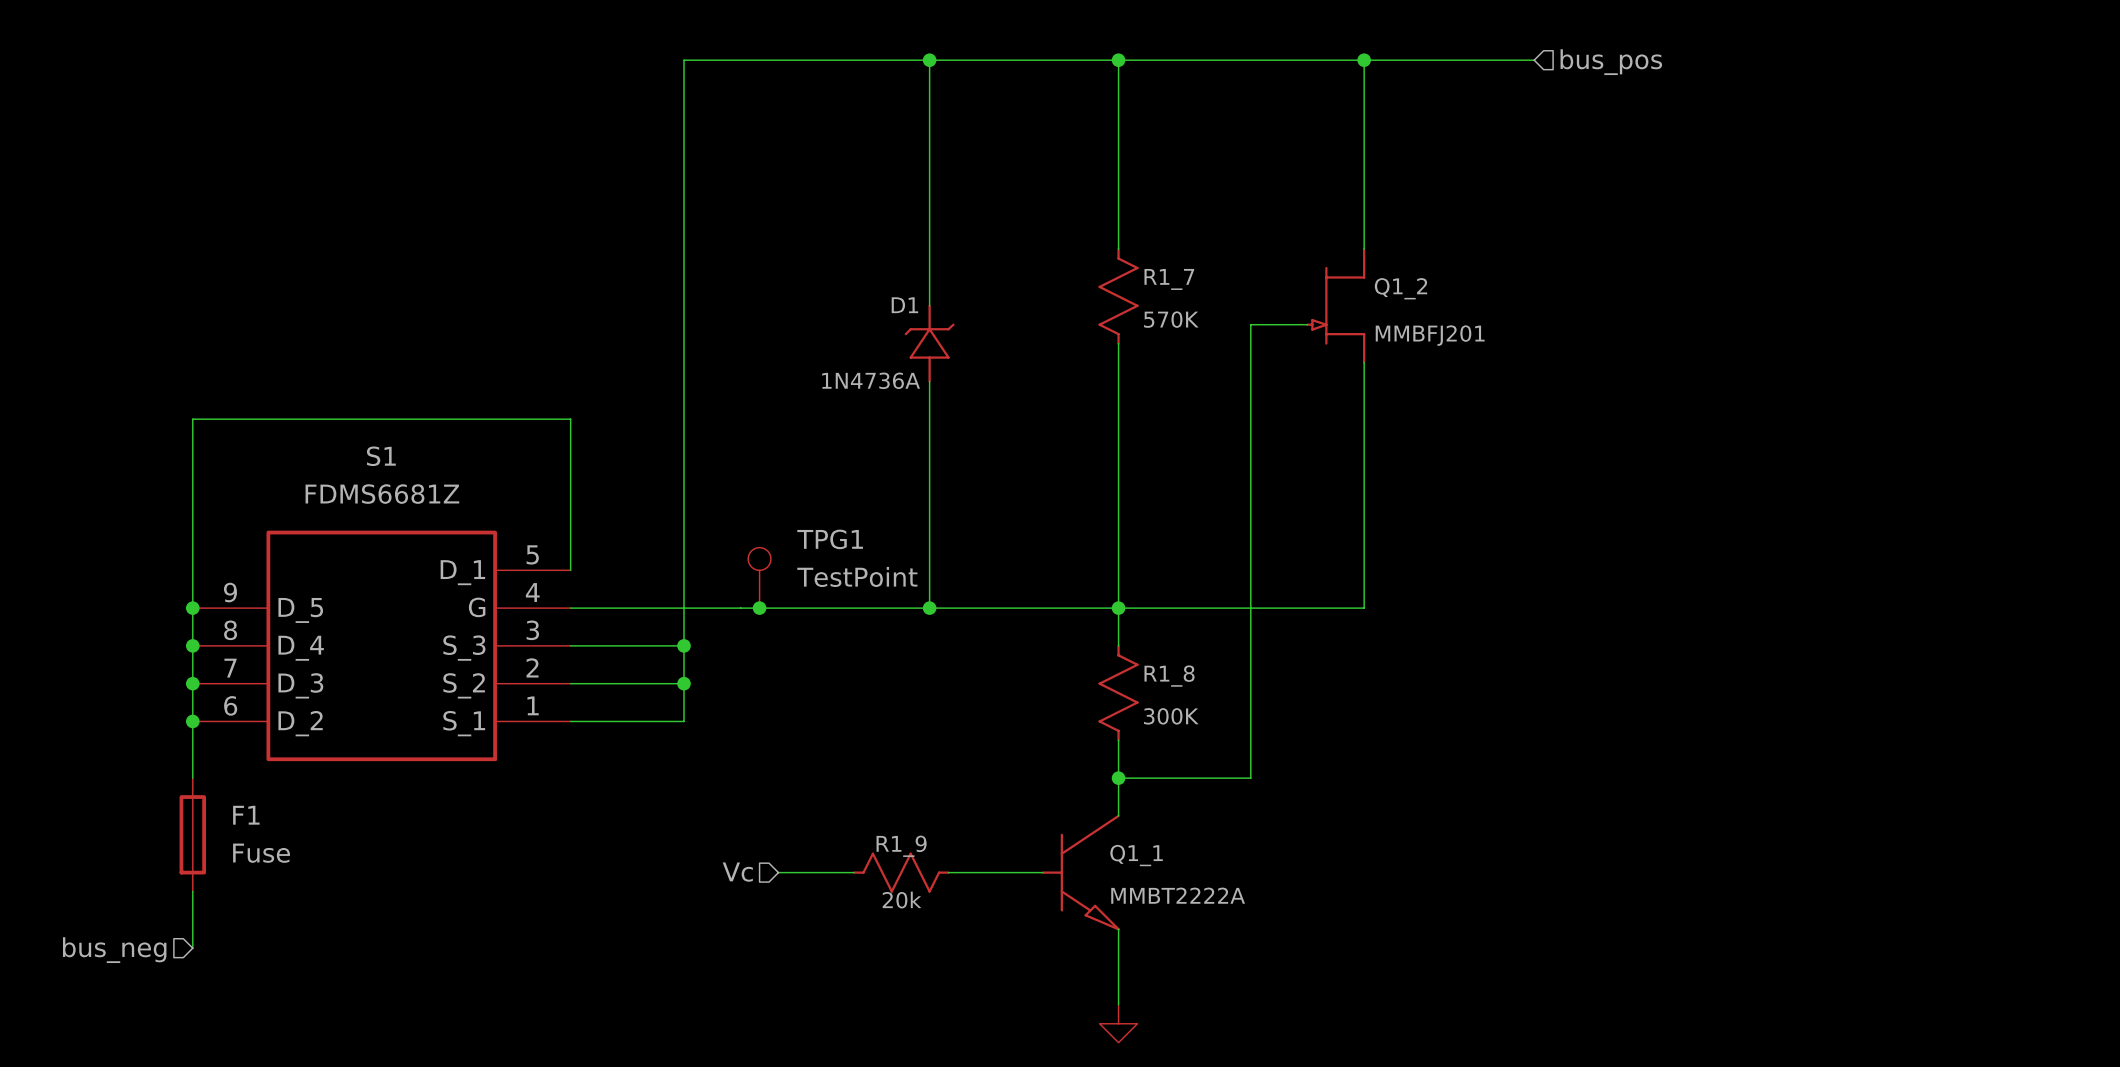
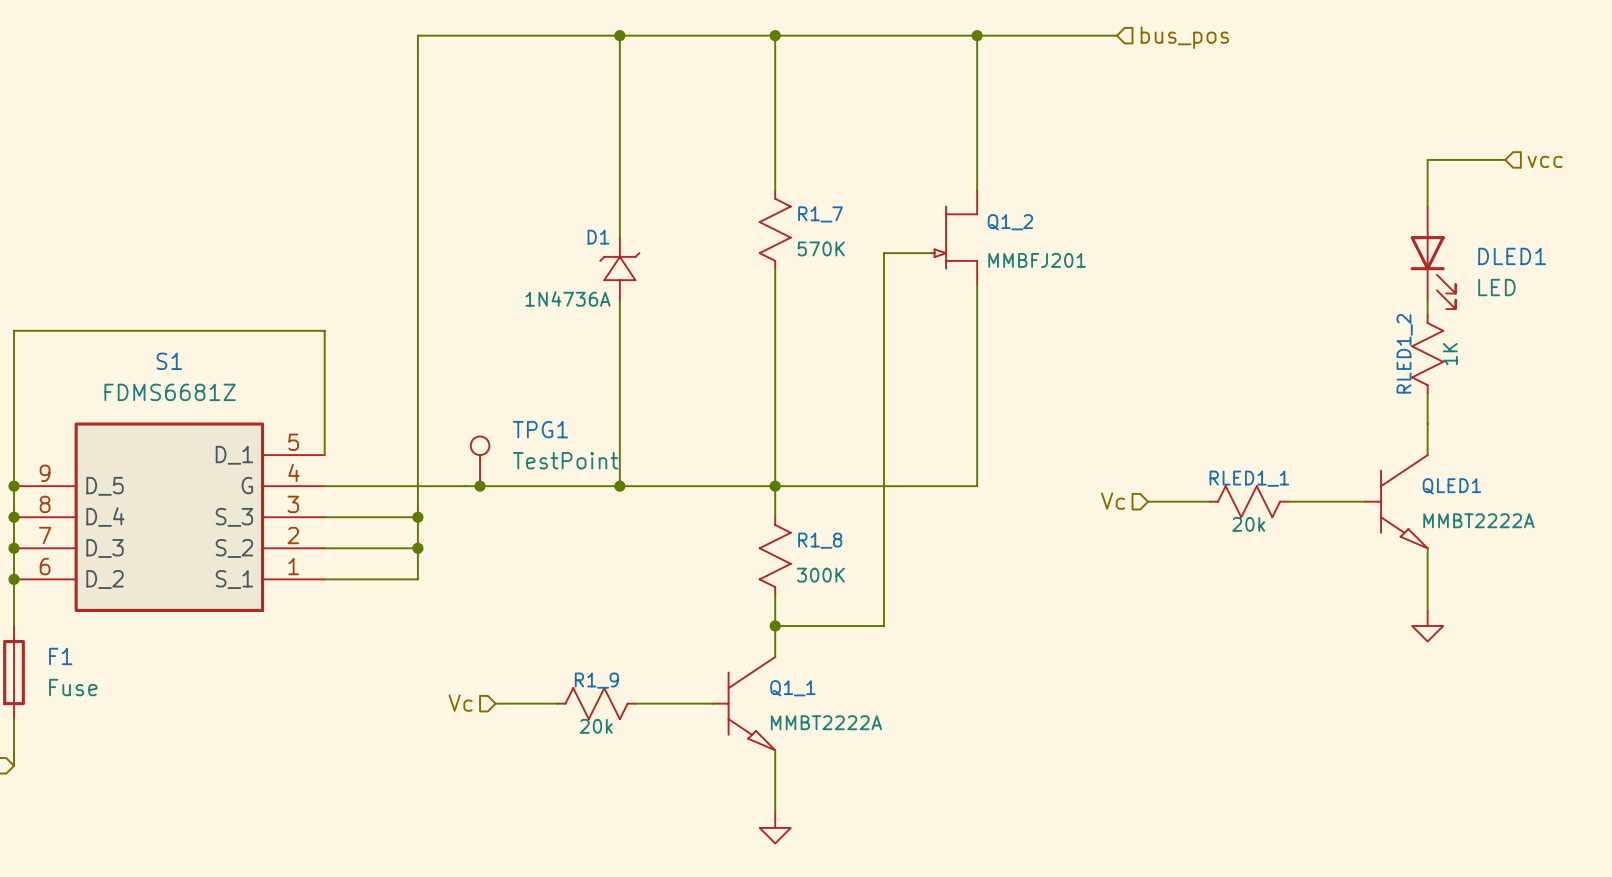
wire: none -> (1505, 159) (1427, 159) (1427, 206)
hierarchical label: none -> vcc (1545, 161)
DLED1: none -> LED (1433, 257)
wire: none -> (1427, 299) (1427, 315)
RLED1_2: none -> 1K (1427, 354)
wire: none -> (1427, 392) (1427, 455)
hierarchical label: none -> Vc (1113, 501)
wire: none -> (1148, 501) (1210, 501)
RLED1_1: none -> 20k (1249, 501)
wire: none -> (1287, 501) (1365, 501)
QLED1: none -> MMBT2222A (1396, 501)
wire: none -> (1427, 548) (1427, 610)
power symbol: none -> (1427, 625)

